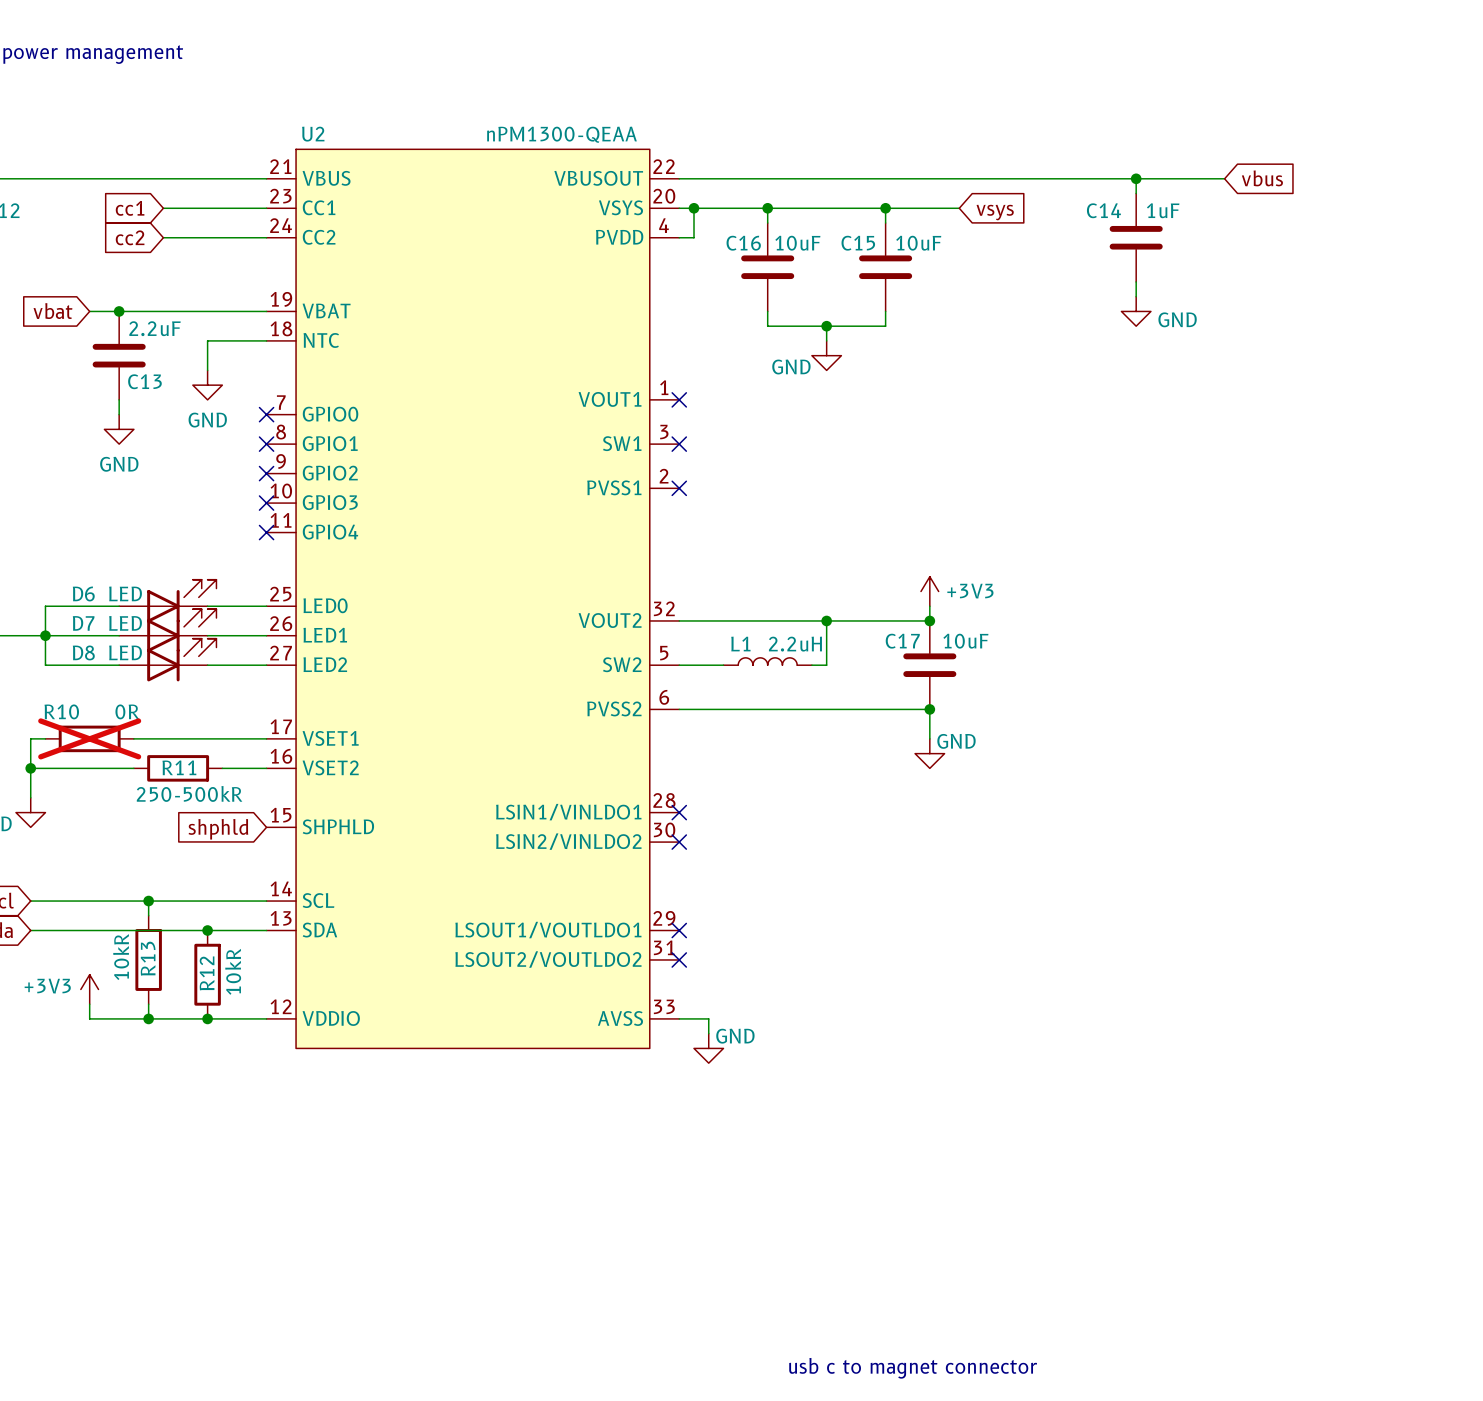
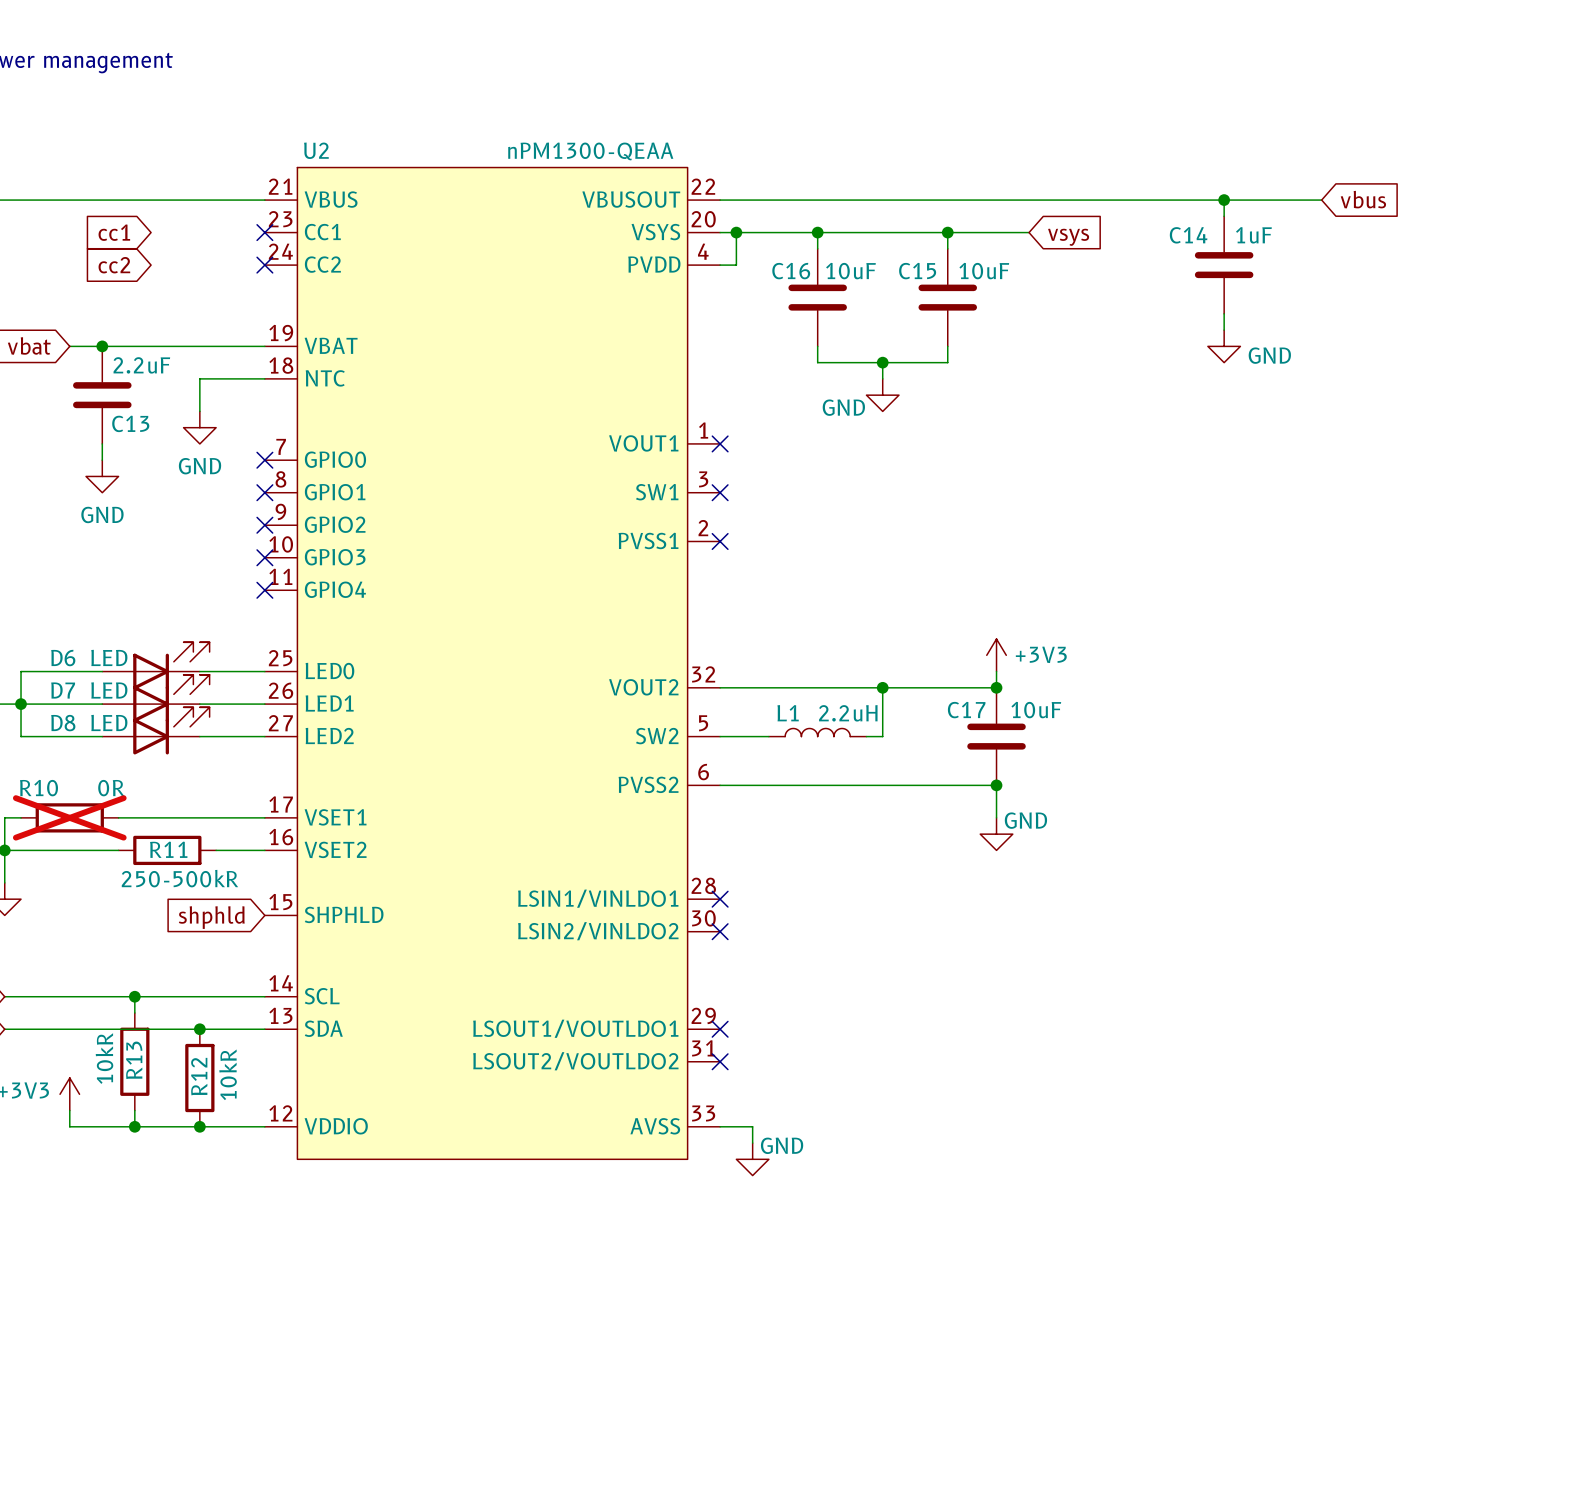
wire: (163, 208) (266, 208) -> none
no-connect mark: none -> (264, 232)
wire: (163, 237) (266, 237) -> none
no-connect mark: none -> (264, 265)

